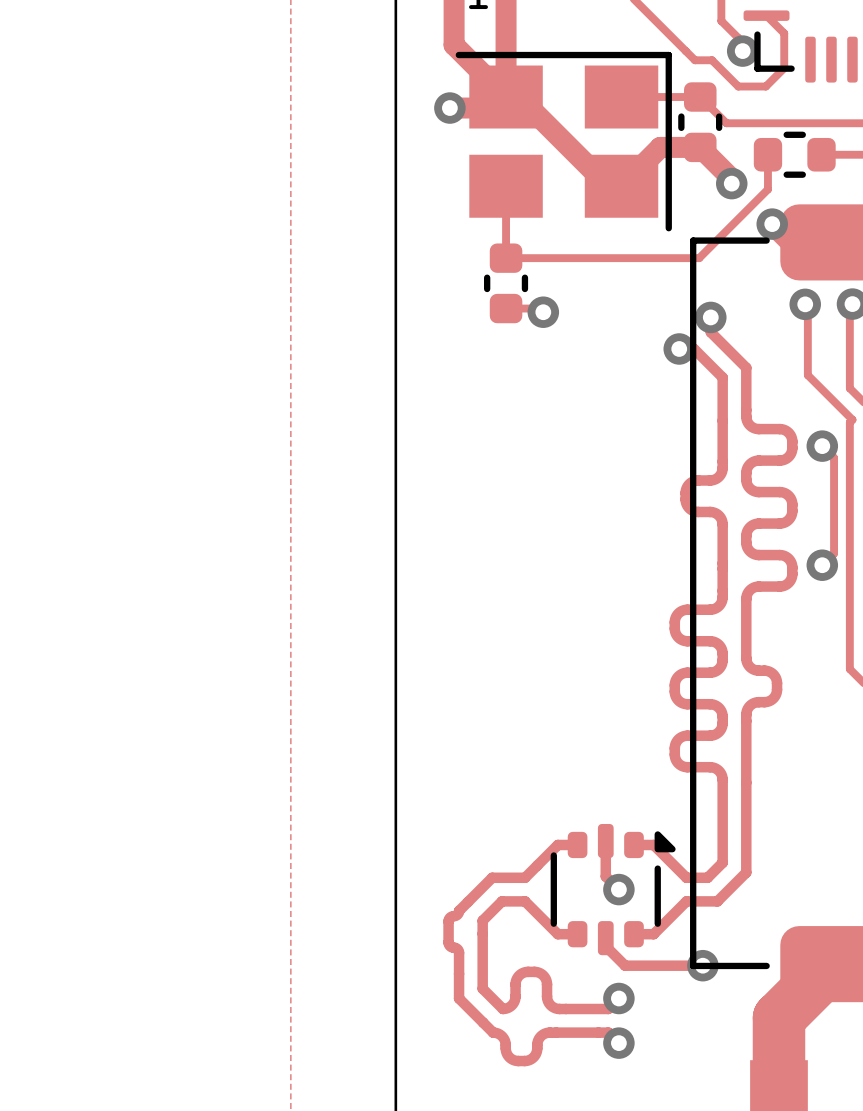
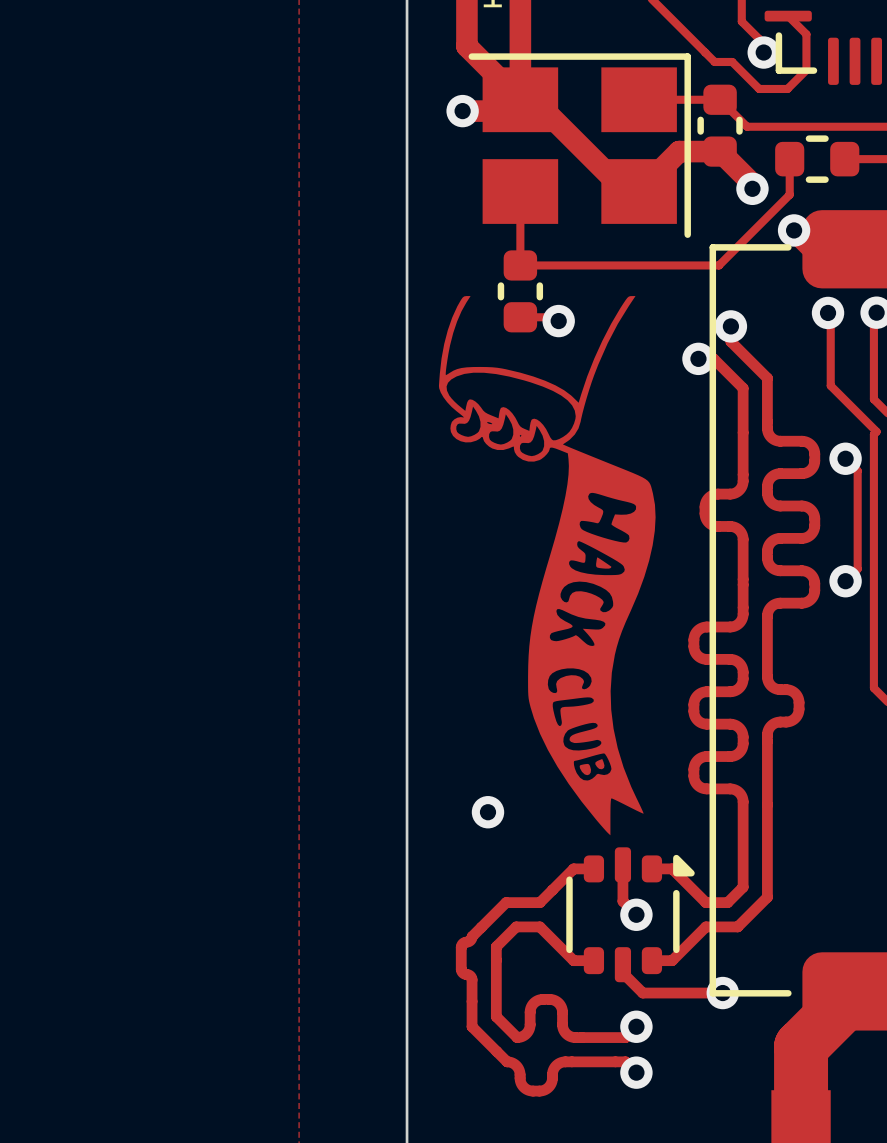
drawing: none -> [438, 296, 656, 836]
via: none -> (487, 812)

